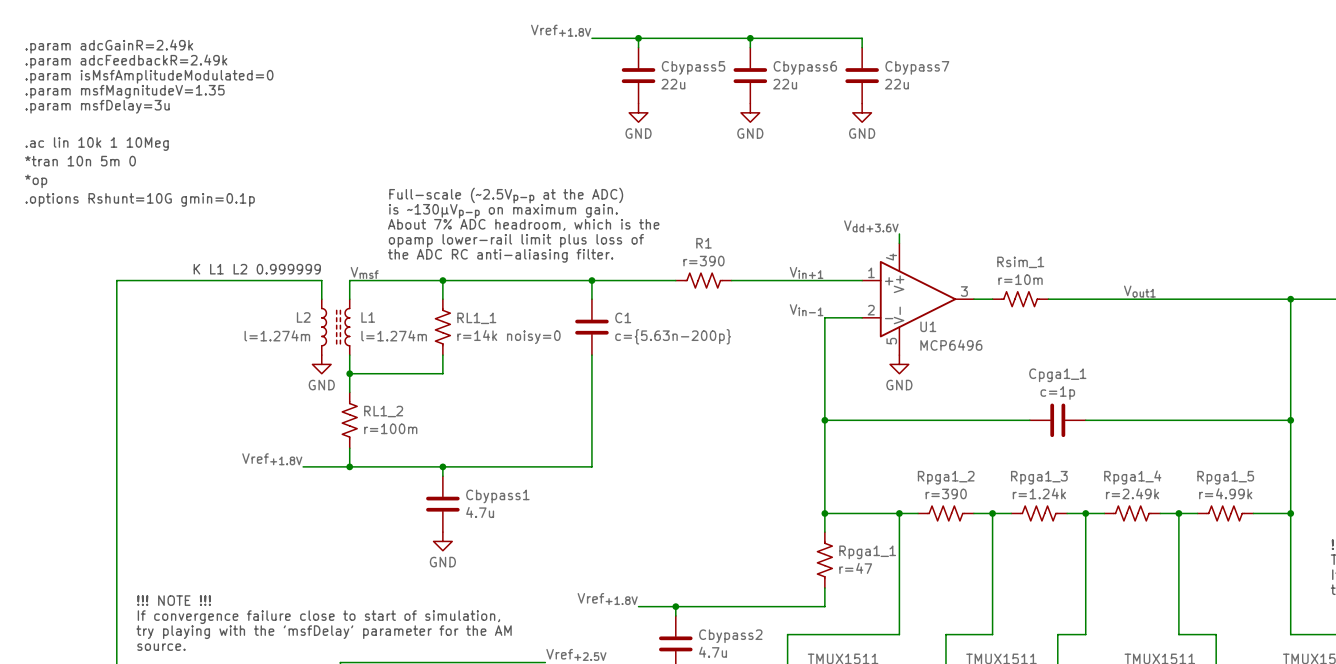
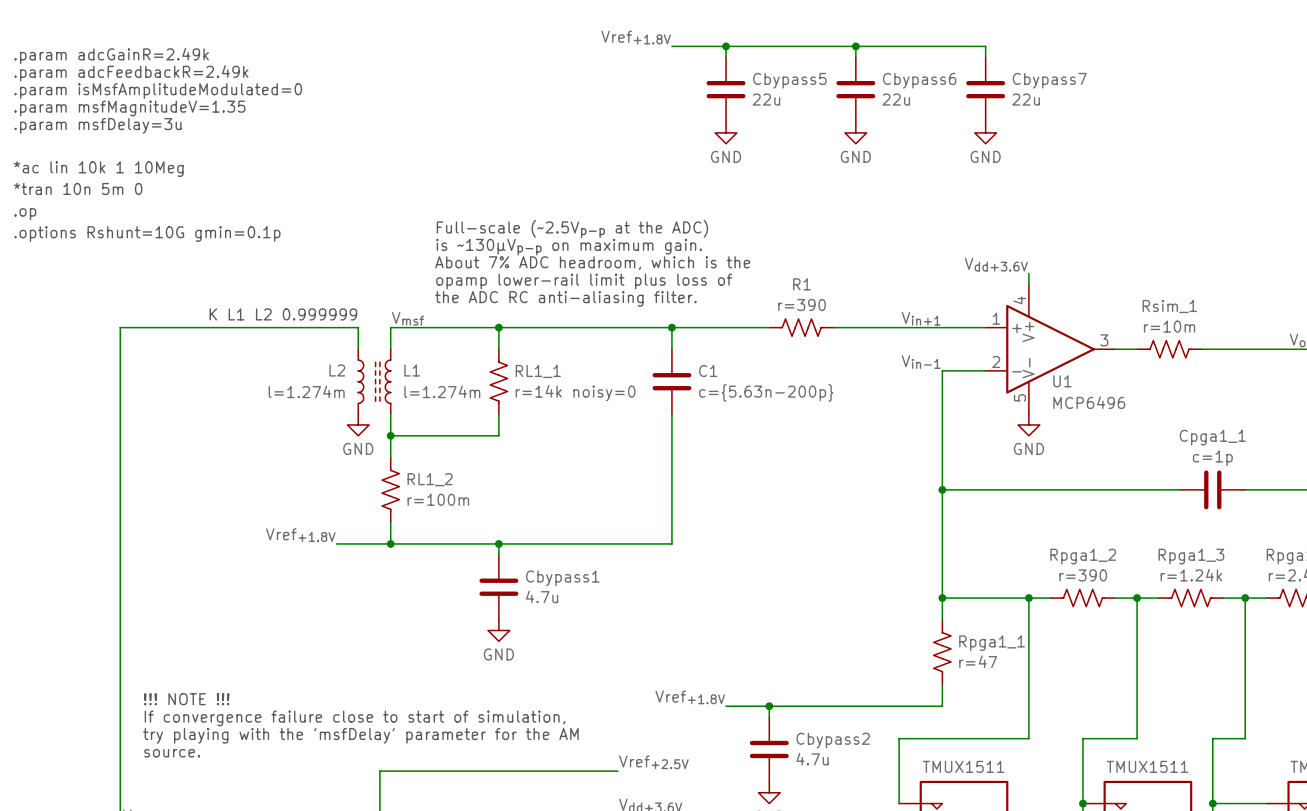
text: .ac lin 10k 1 10Meg (97, 144) -> *ac lin 10k 1 10Meg (98, 169)
text: *op (36, 181) -> .op (25, 214)

